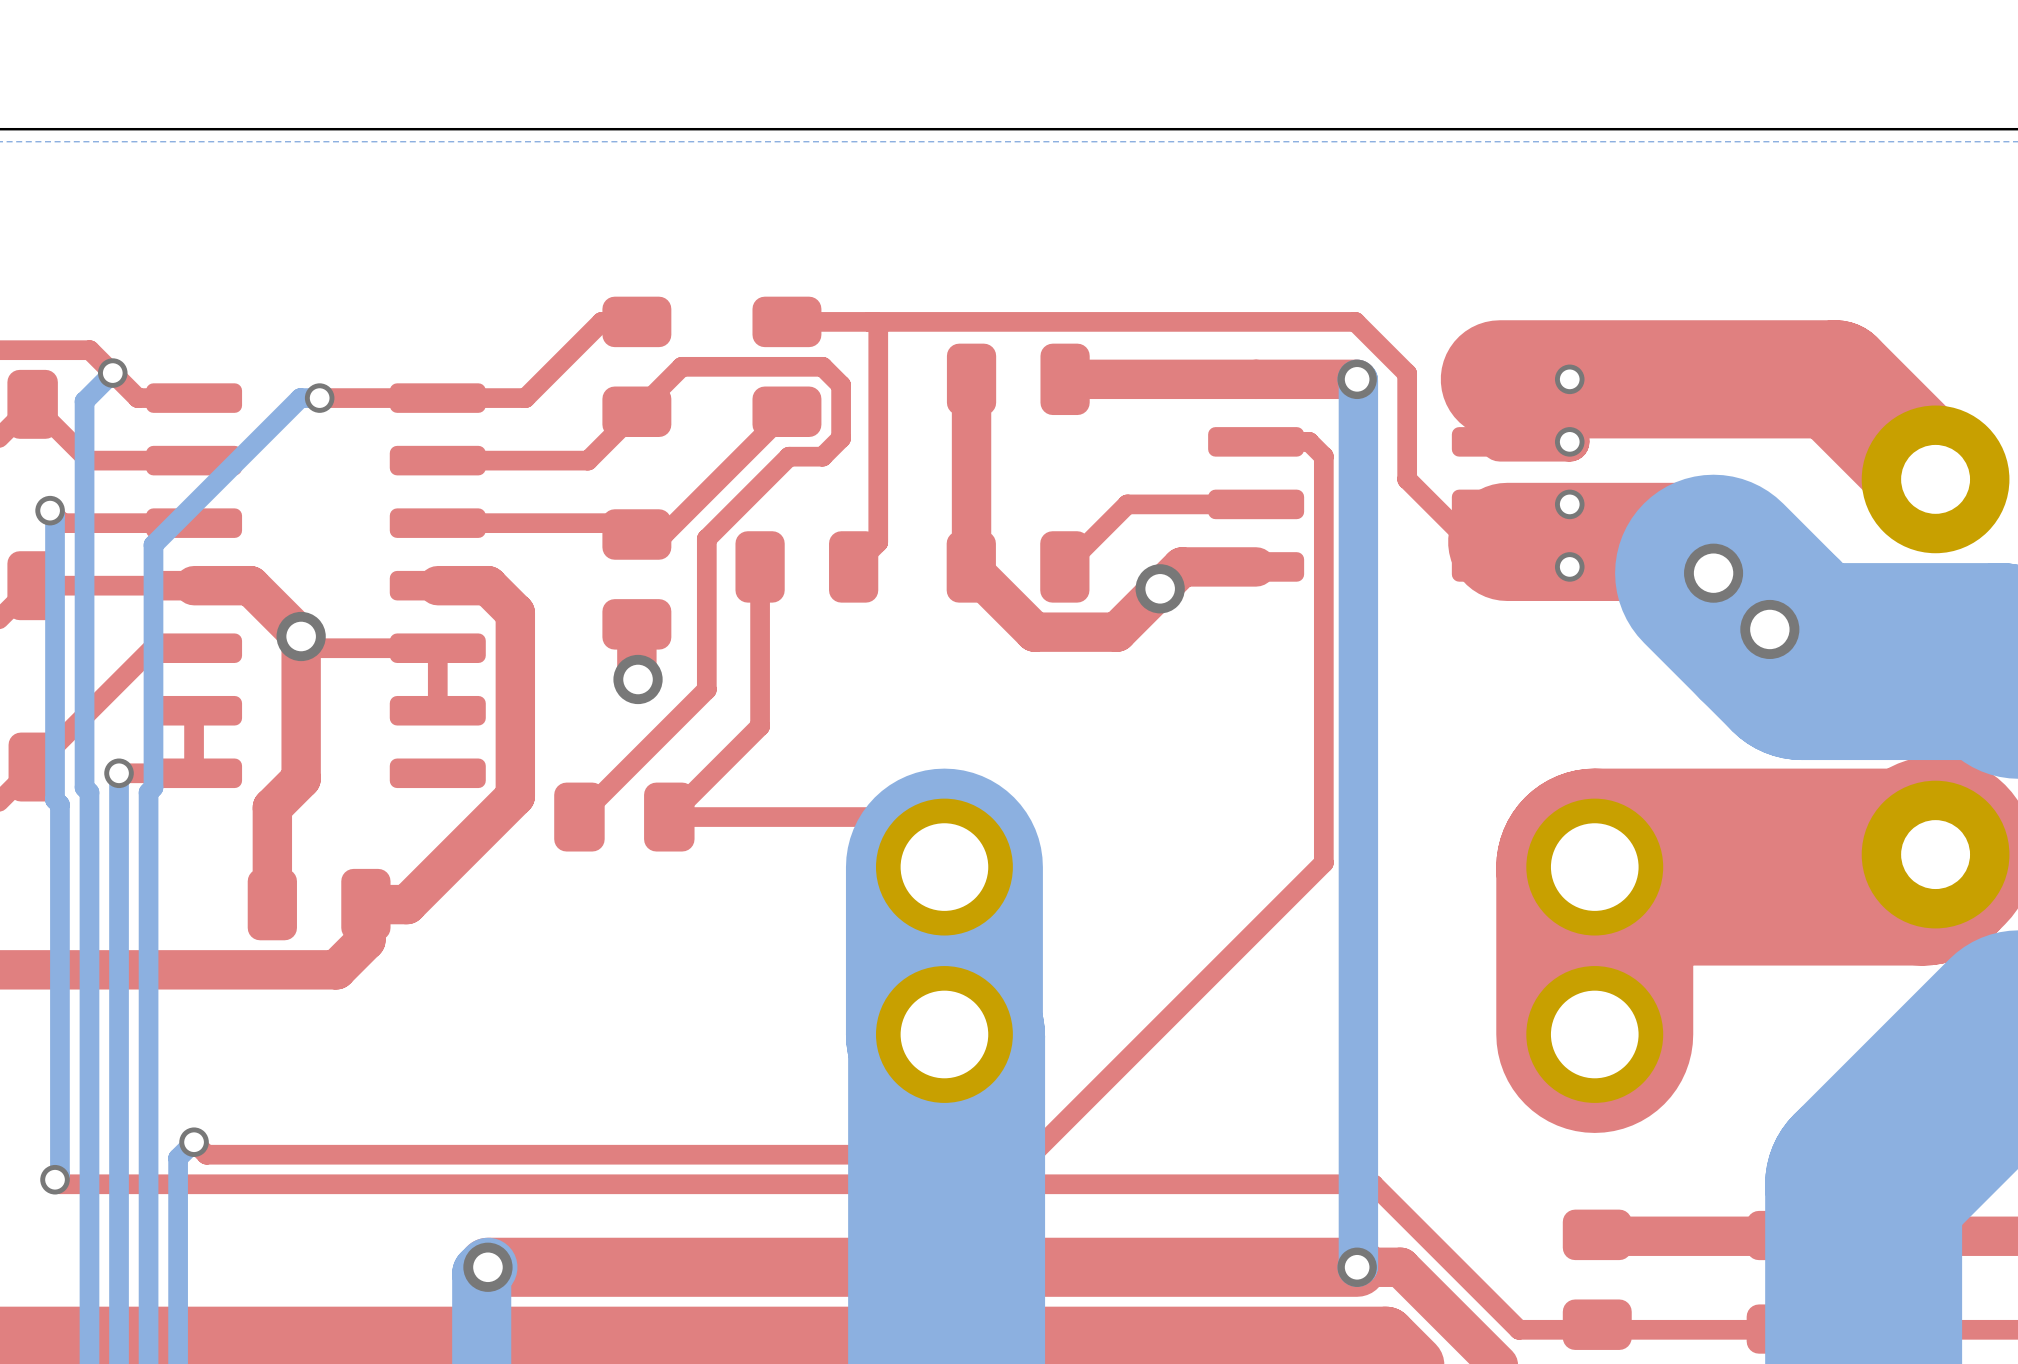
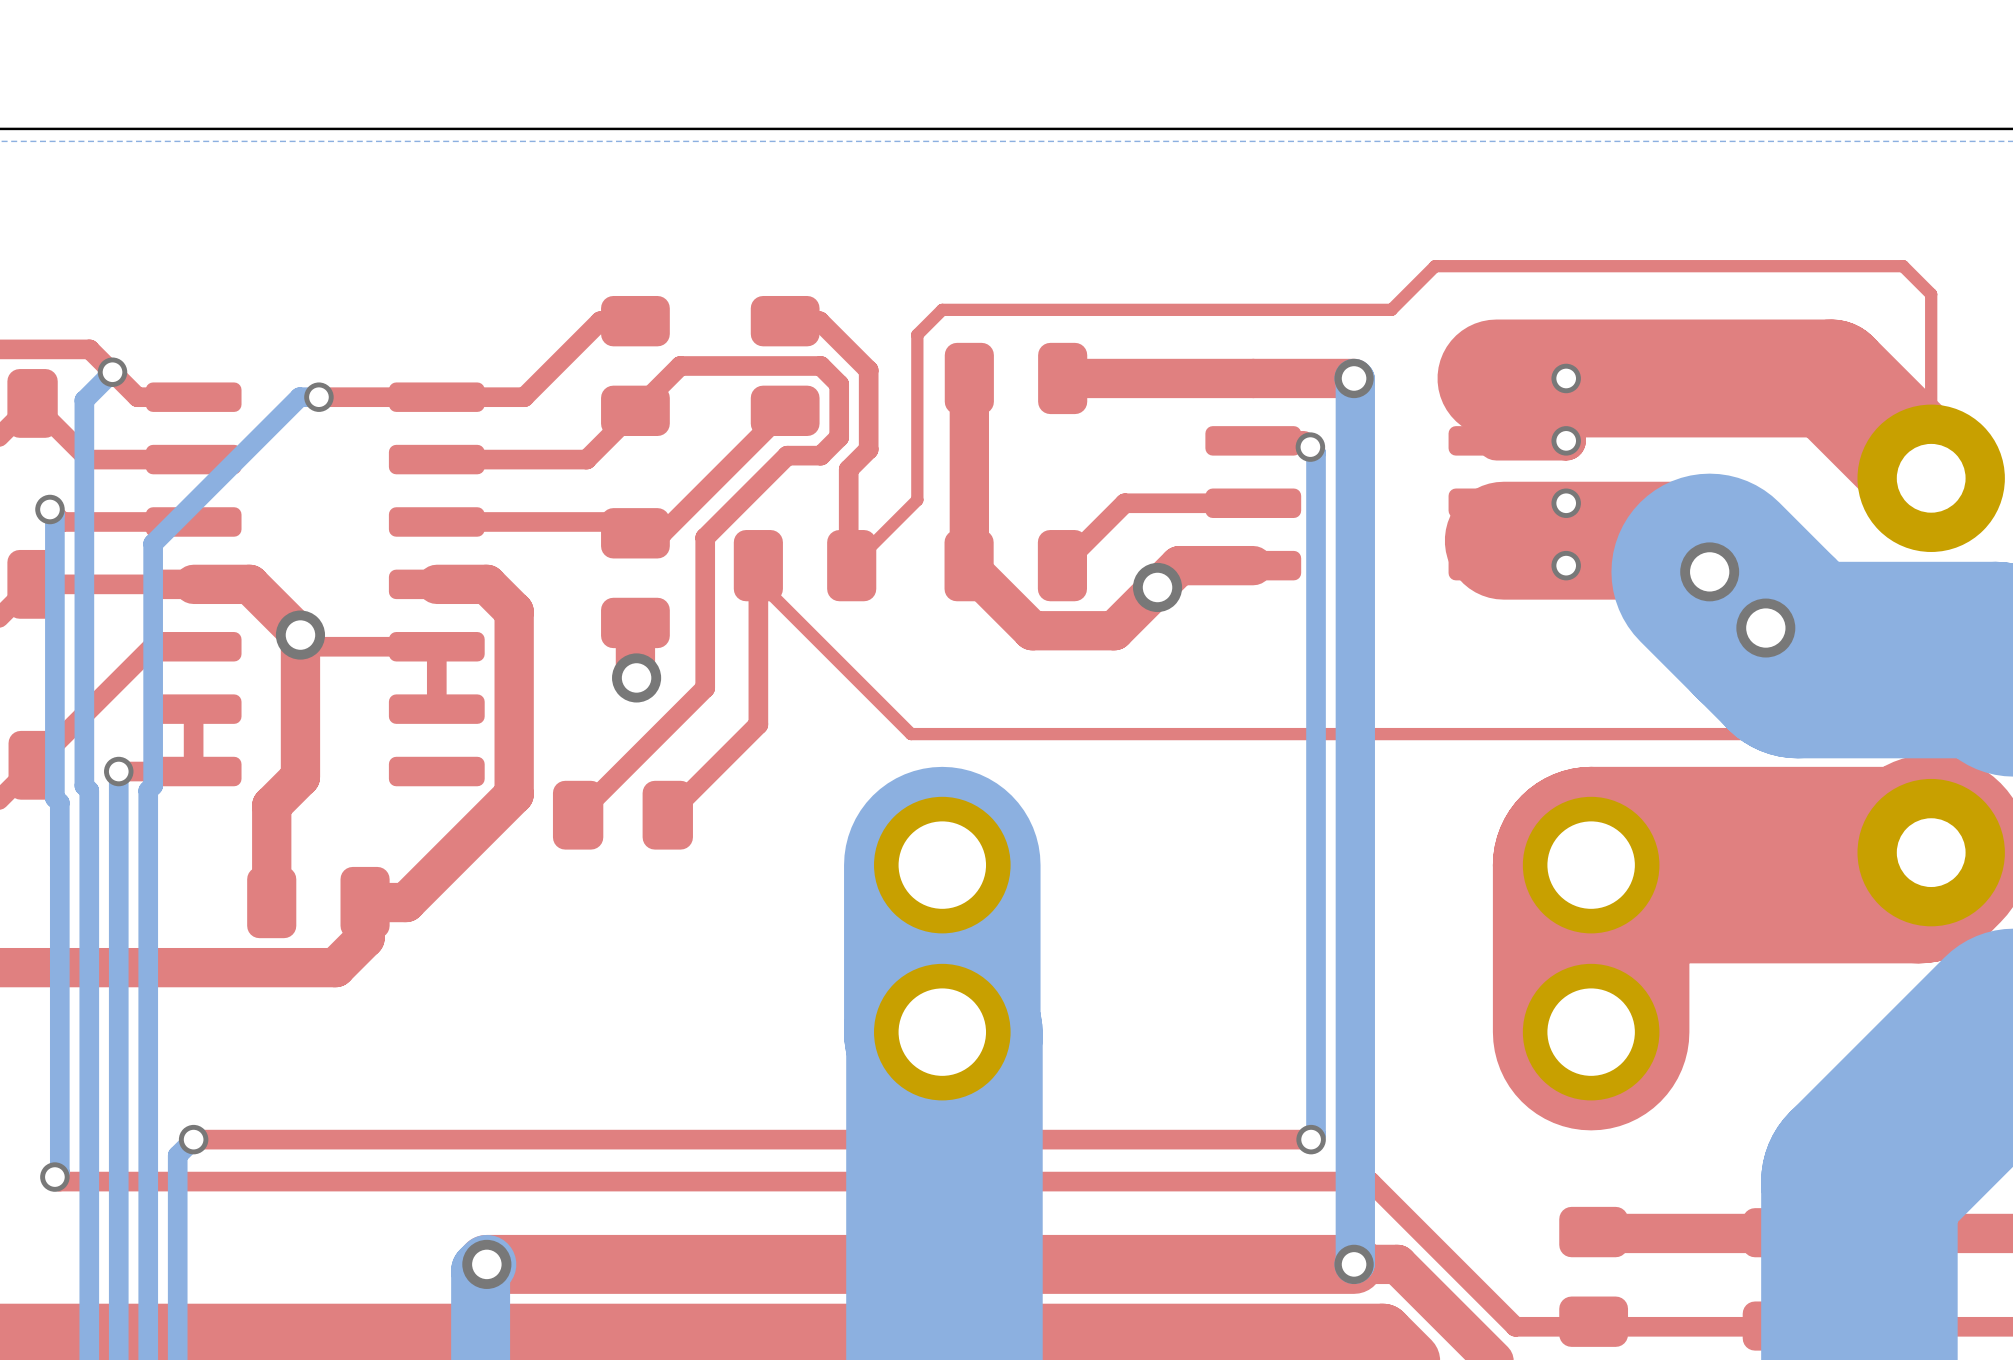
top track: (821, 321) (1355, 321) (1407, 373) (1407, 479) (1469, 541) (1507, 541) -> (819, 321) (868, 370) (868, 449) (848, 469) (848, 562) (851, 565)
top track: (875, 321) (878, 324) (878, 542) -> (1931, 478) (1931, 294) (1903, 266) (1435, 266) (1391, 309) (942, 309) (917, 334) (917, 500) (876, 541)
top track: (1307, 441) (1323, 456) (1323, 862) (1031, 1154) (206, 1154) (194, 1142) -> (1311, 1139) (193, 1139)
bottom track: none -> (1310, 447) (1316, 452) (1316, 1134) (1311, 1139)
via: none -> (1310, 447)
top track: none -> (758, 565) (758, 581) (911, 734) (1915, 734) (1931, 749) (1931, 852)
top track: (669, 817) (894, 817) (944, 867) -> none
via: none -> (1311, 1139)

